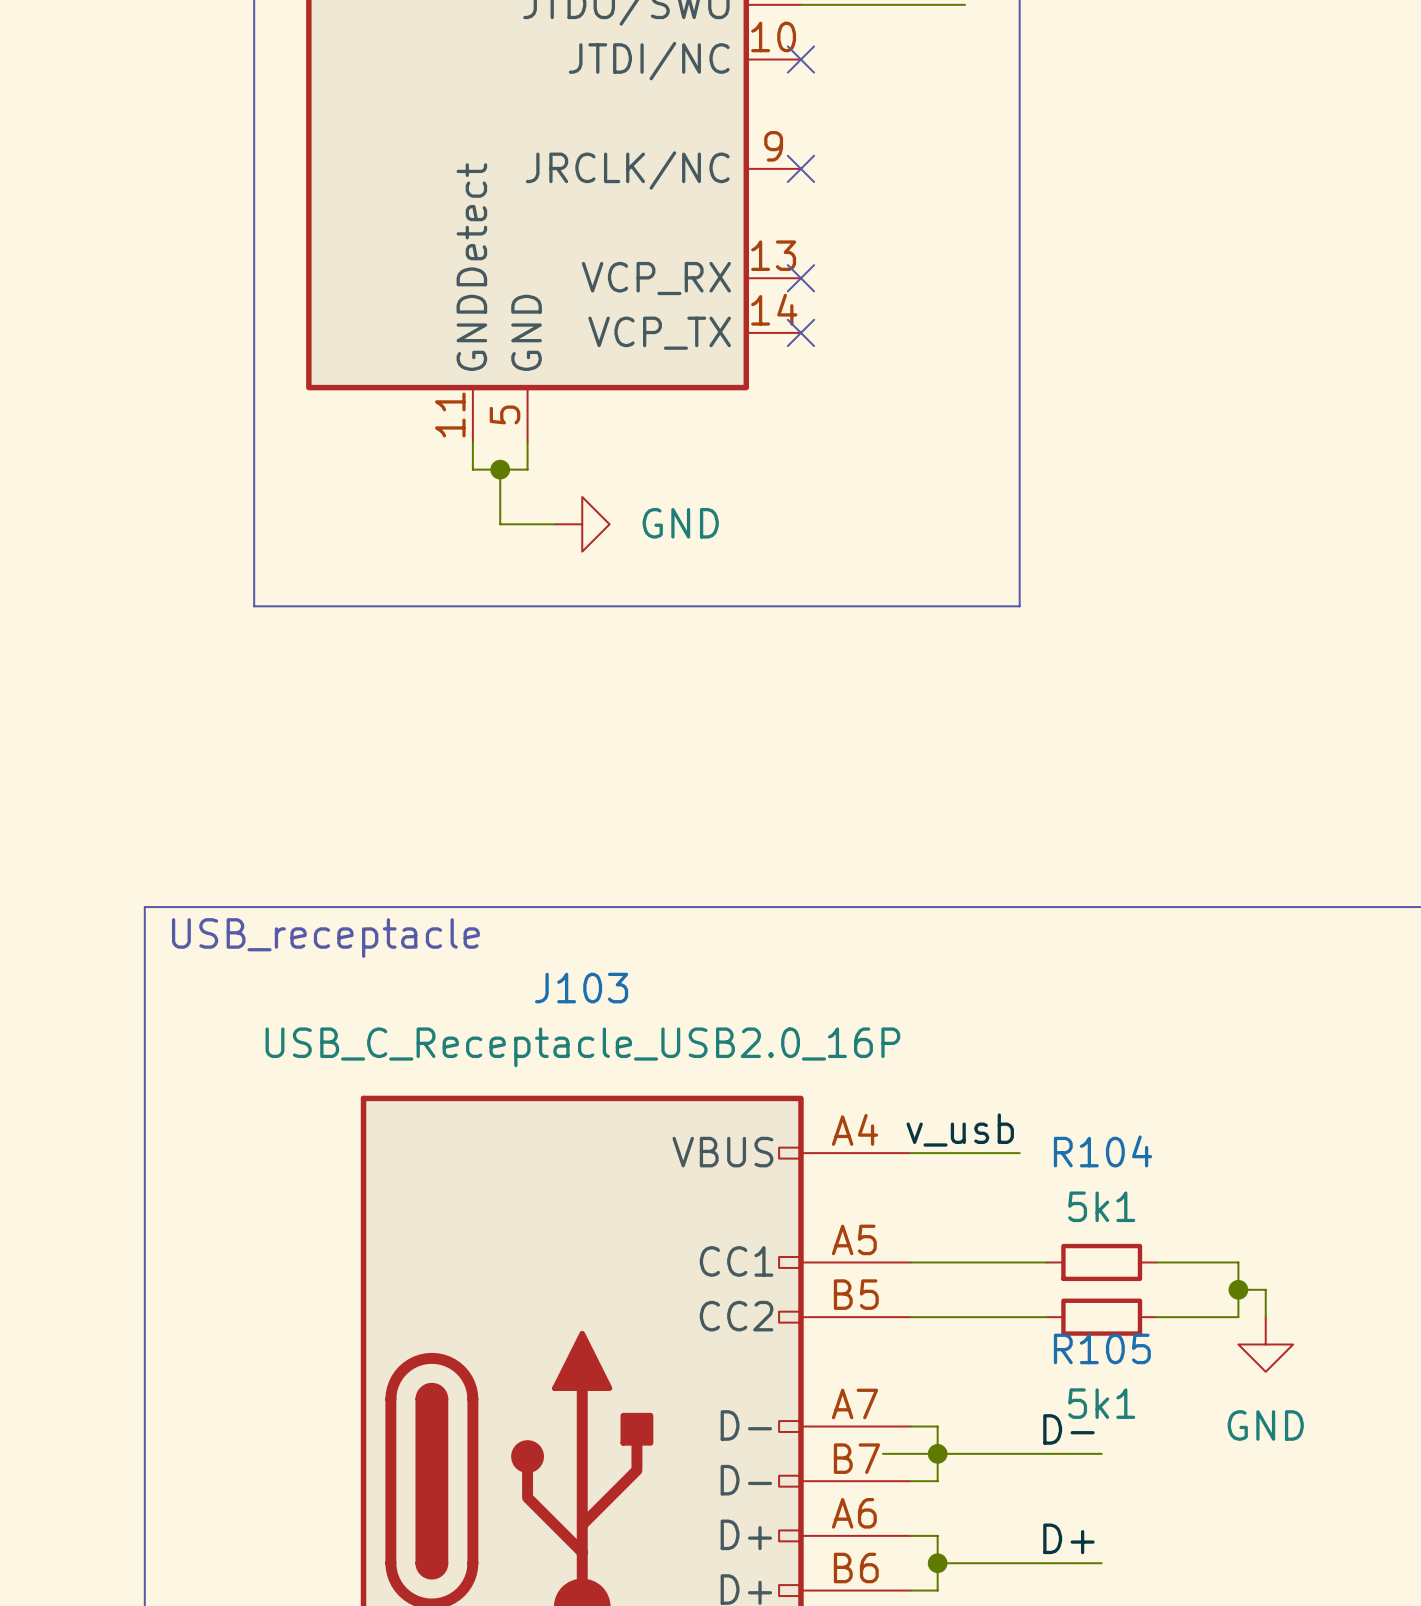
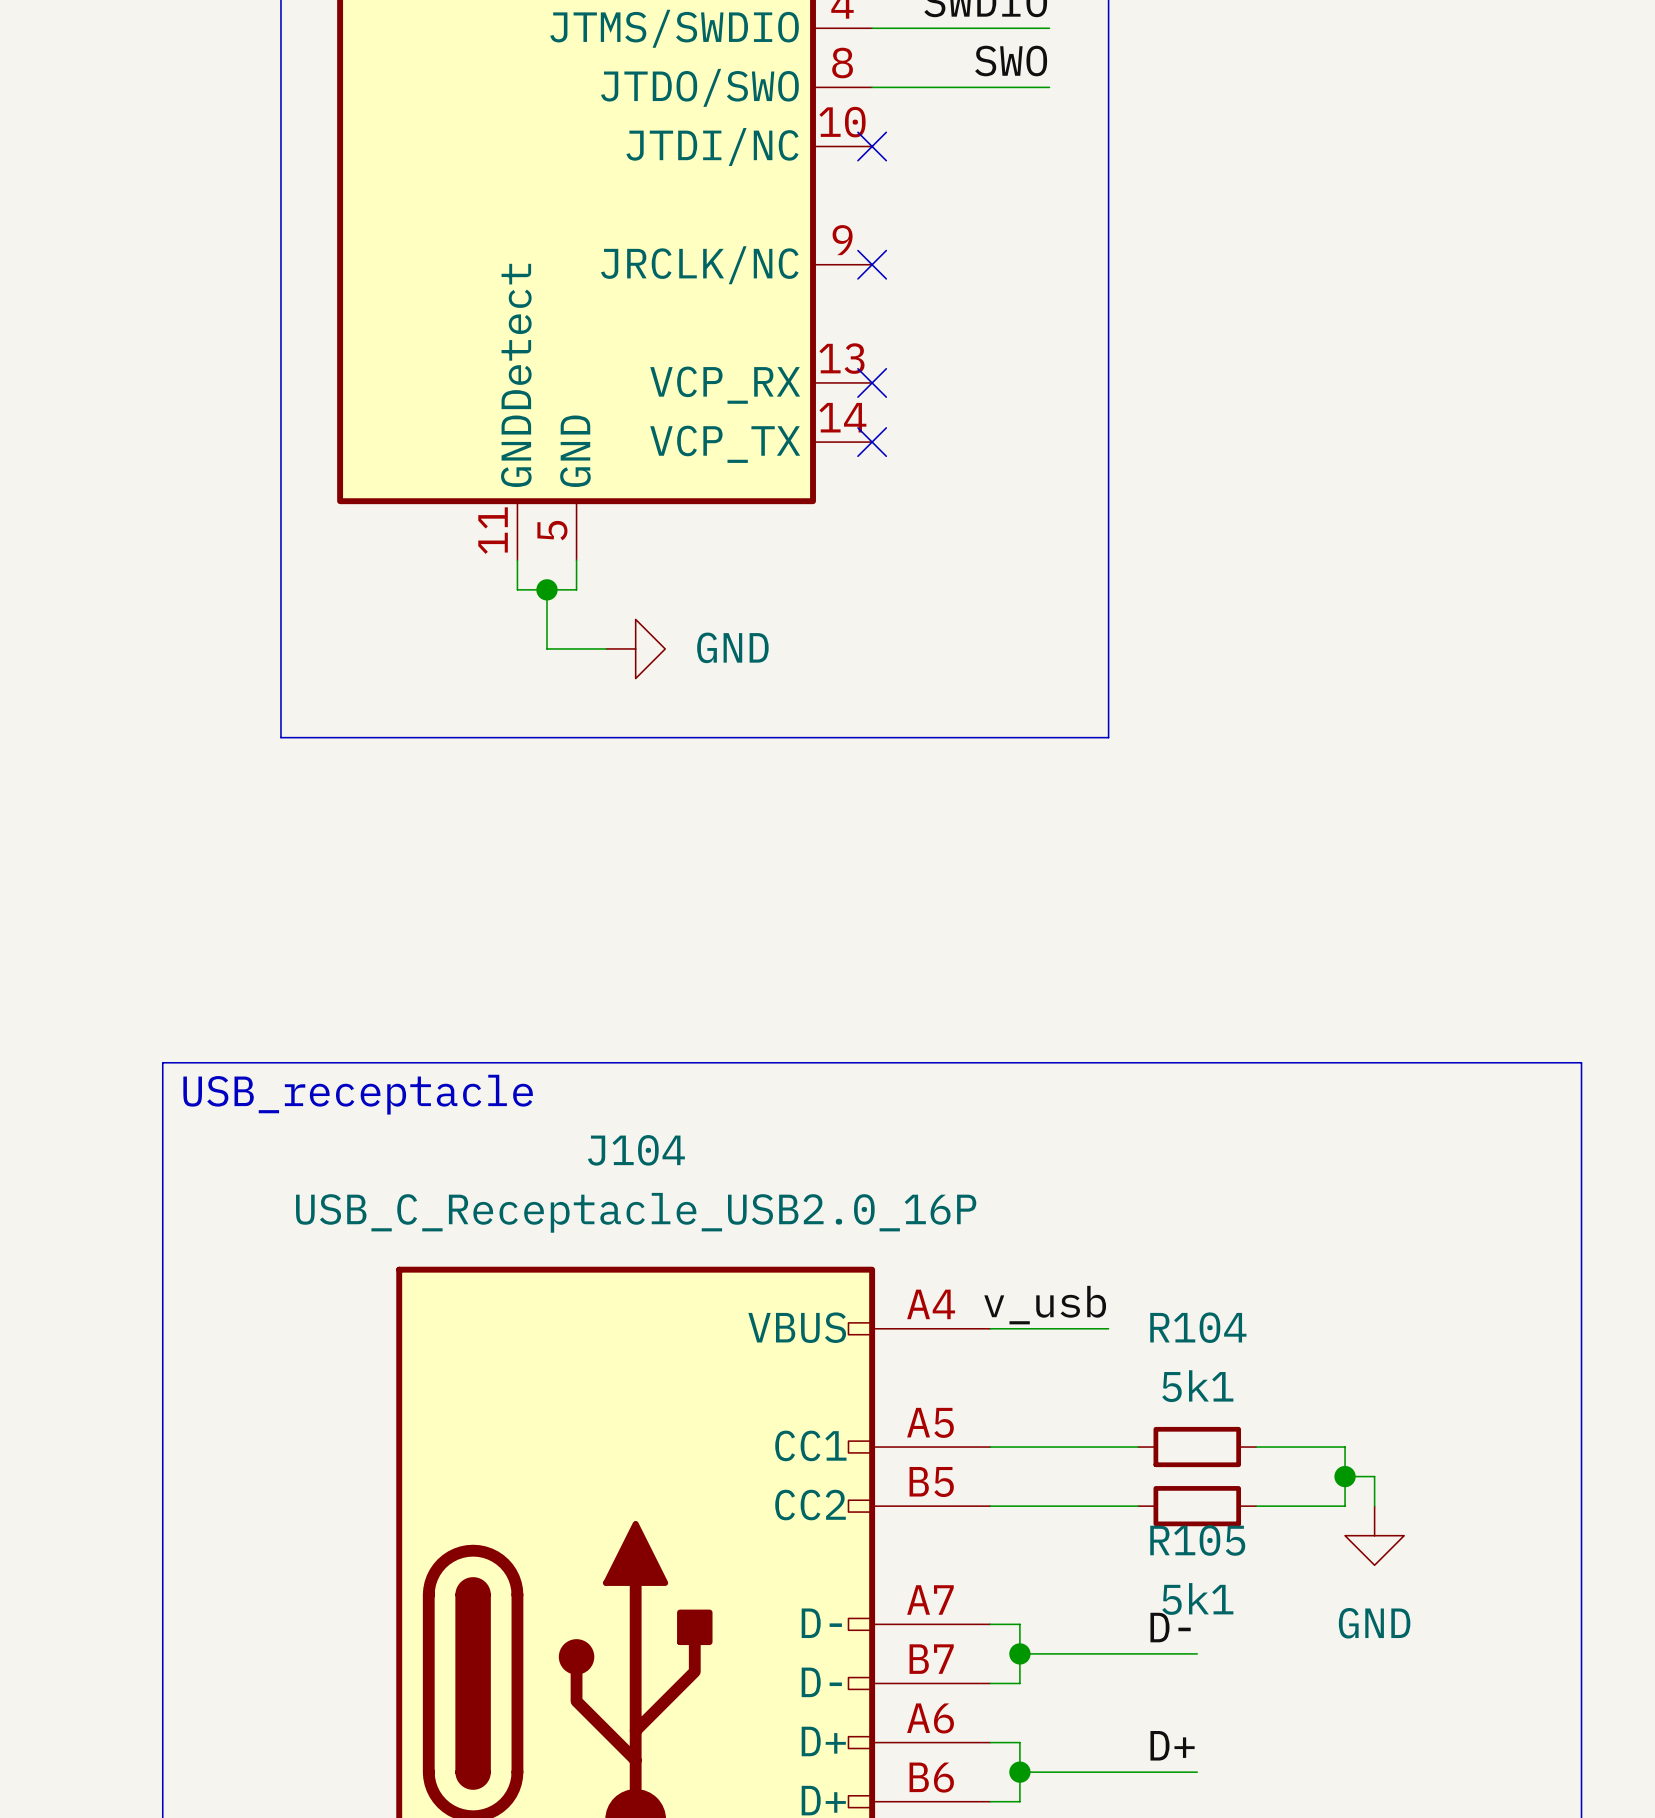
J103 name: J103 (581, 988) -> J104 (636, 1150)
wire: (882, 1453) (937, 1453) -> none

